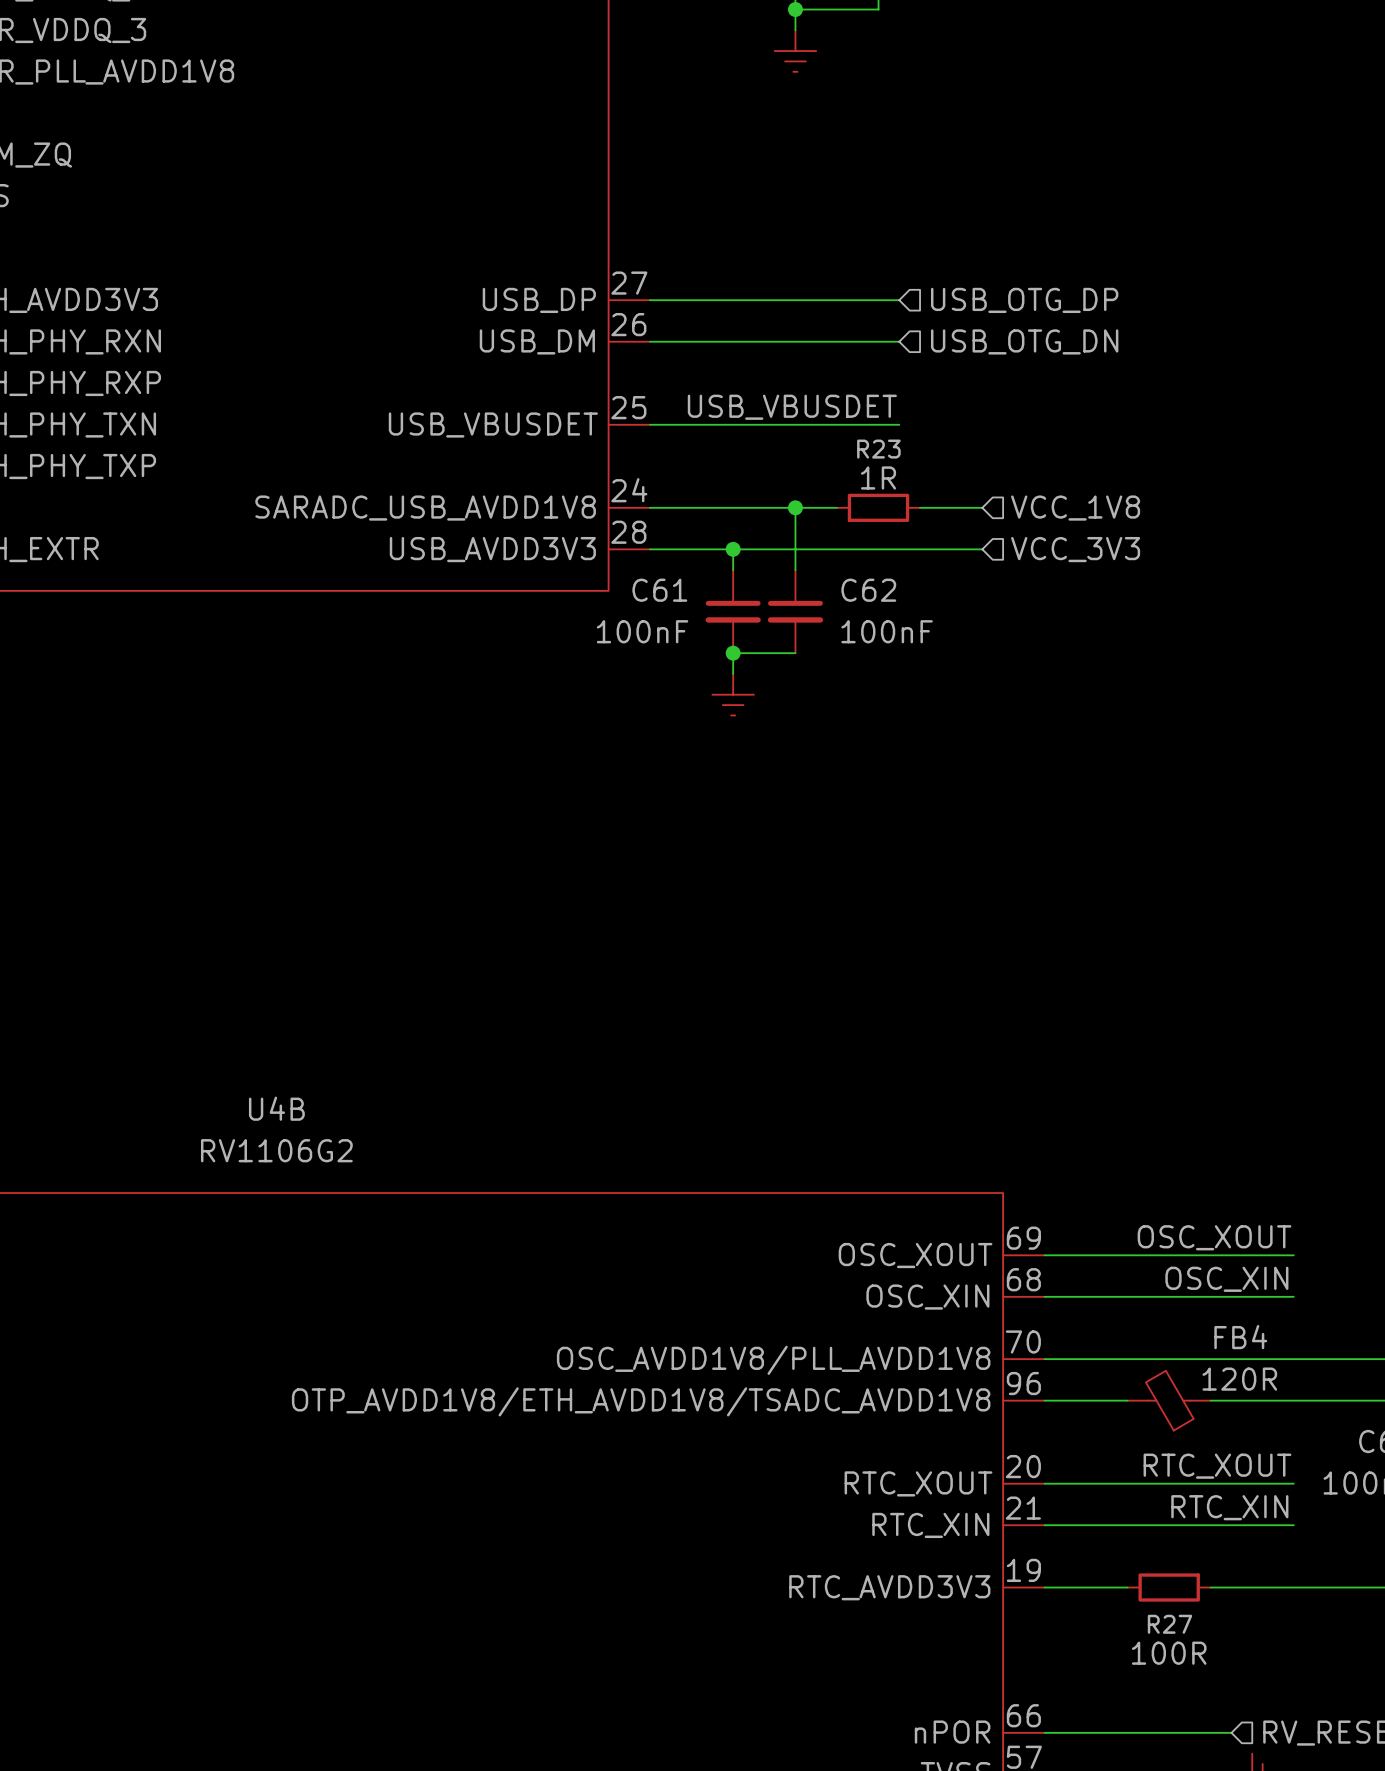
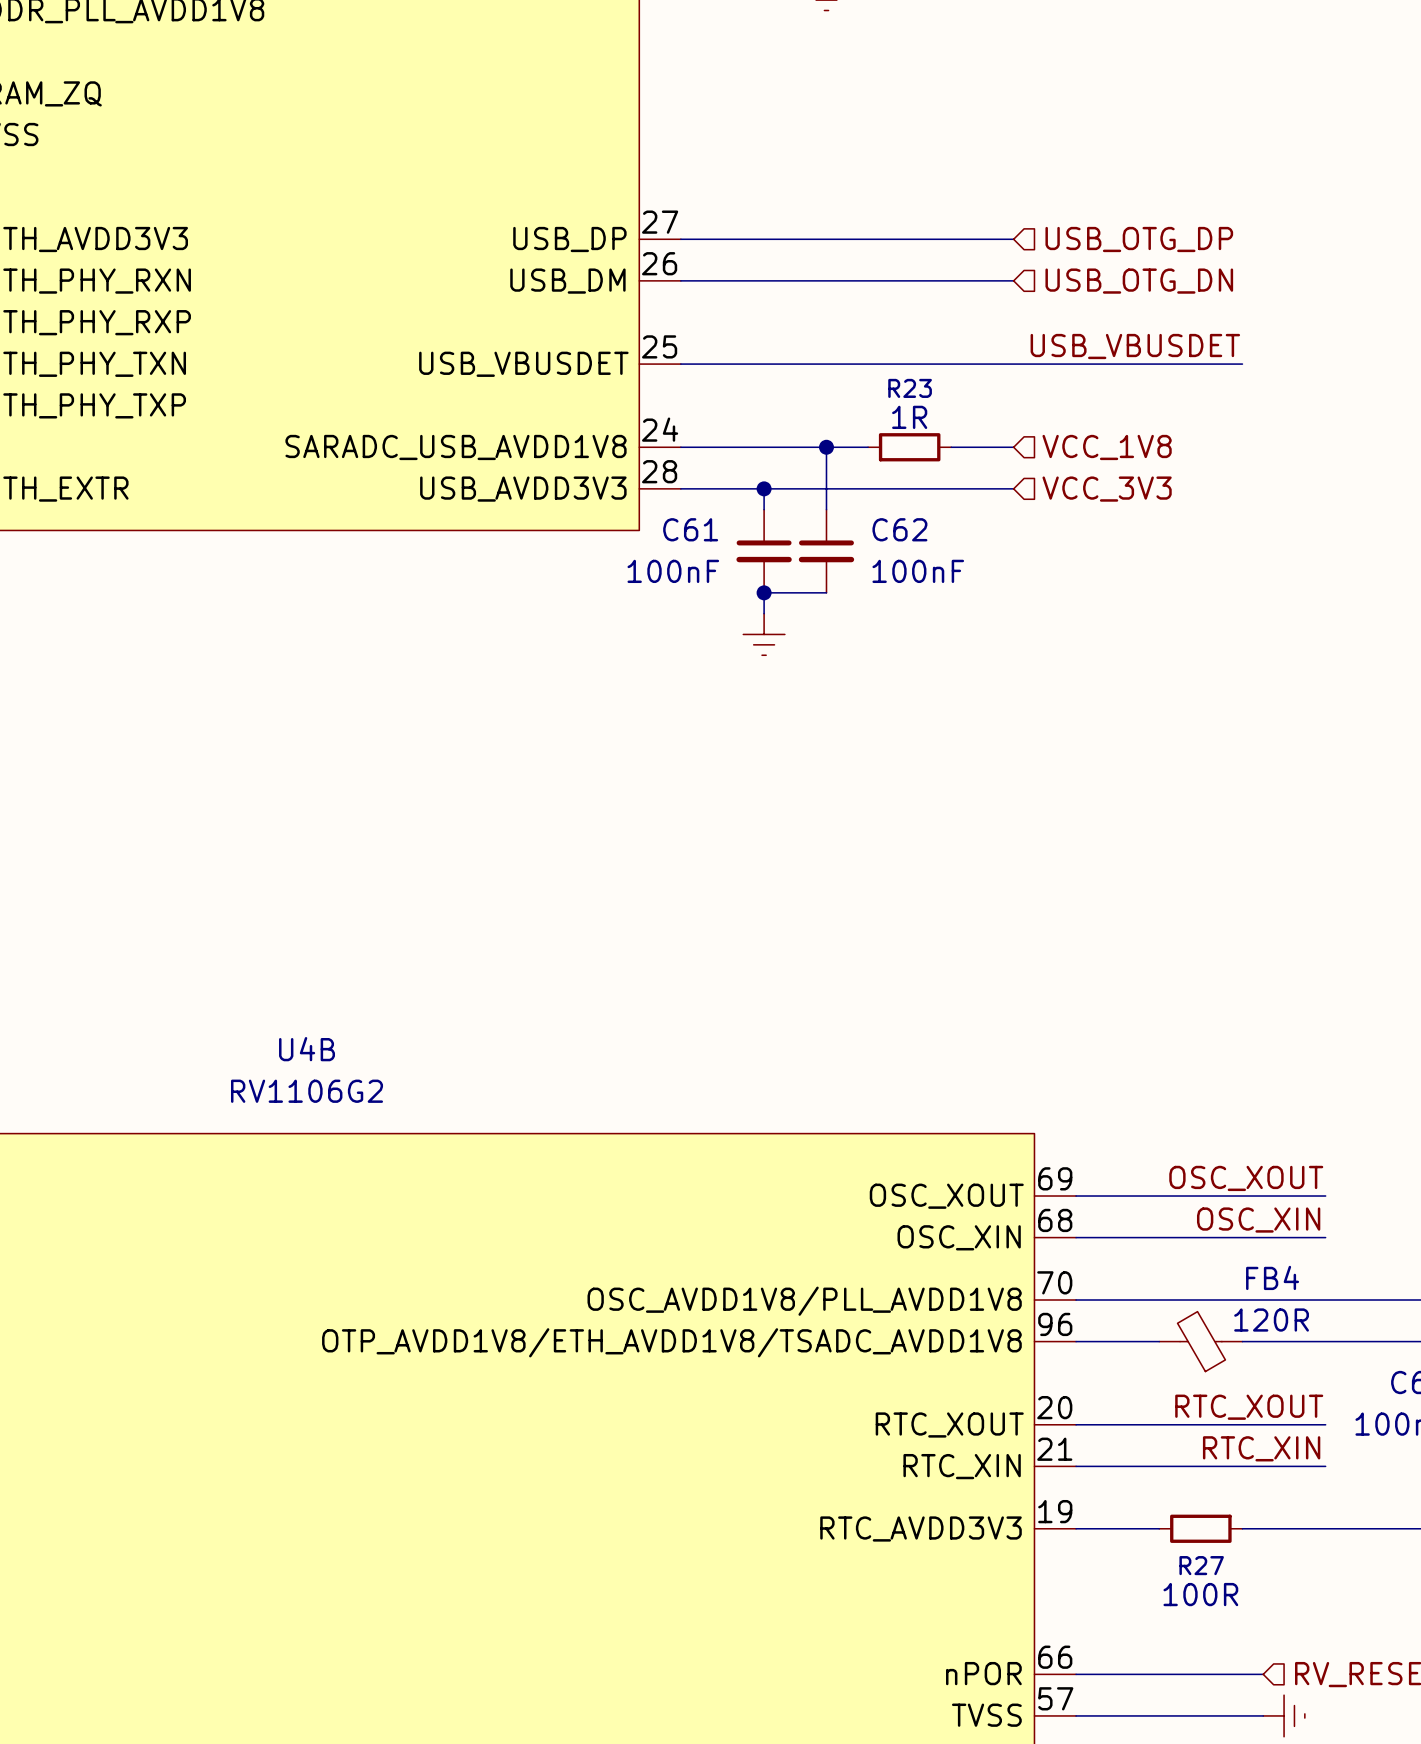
wire: none -> (930, 239) (1013, 239)
hierarchical label position: USB_OTG_DP (1024, 300) -> USB_OTG_DP (1139, 239)
wire: none -> (930, 280) (1013, 280)
hierarchical label position: USB_OTG_DN (1024, 341) -> USB_OTG_DN (1139, 281)
label position: USB_VBUSDET (792, 407) -> USB_VBUSDET (1135, 346)
wire: none -> (930, 364) (1242, 364)

